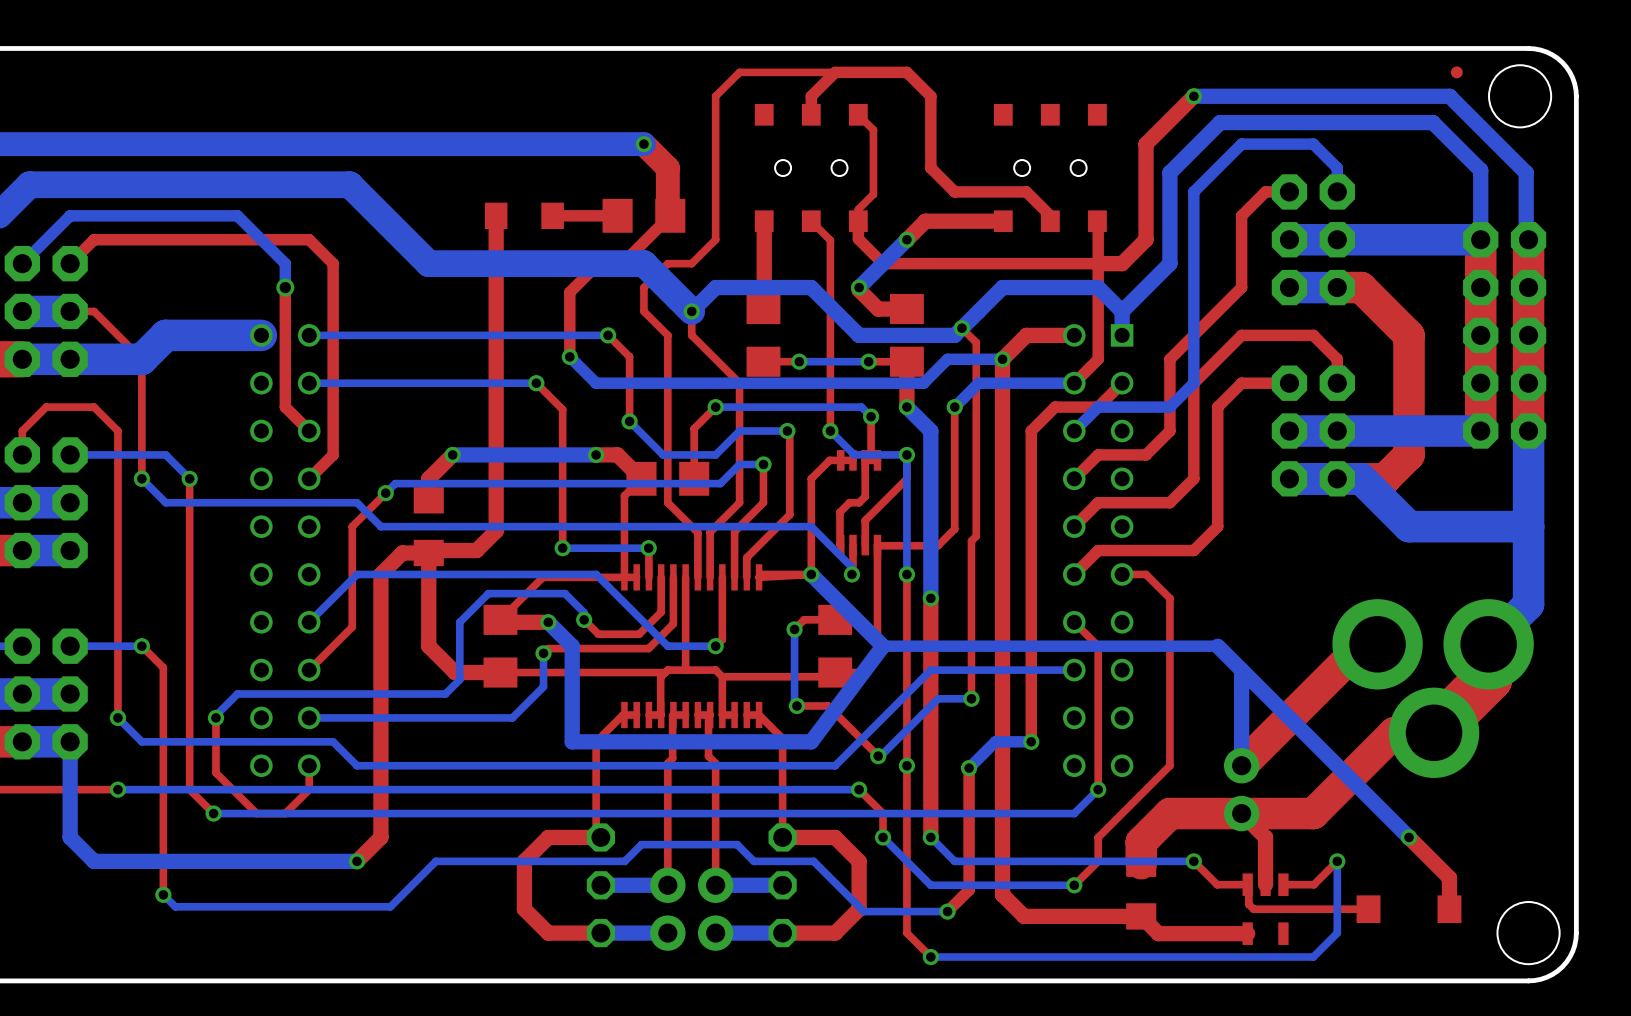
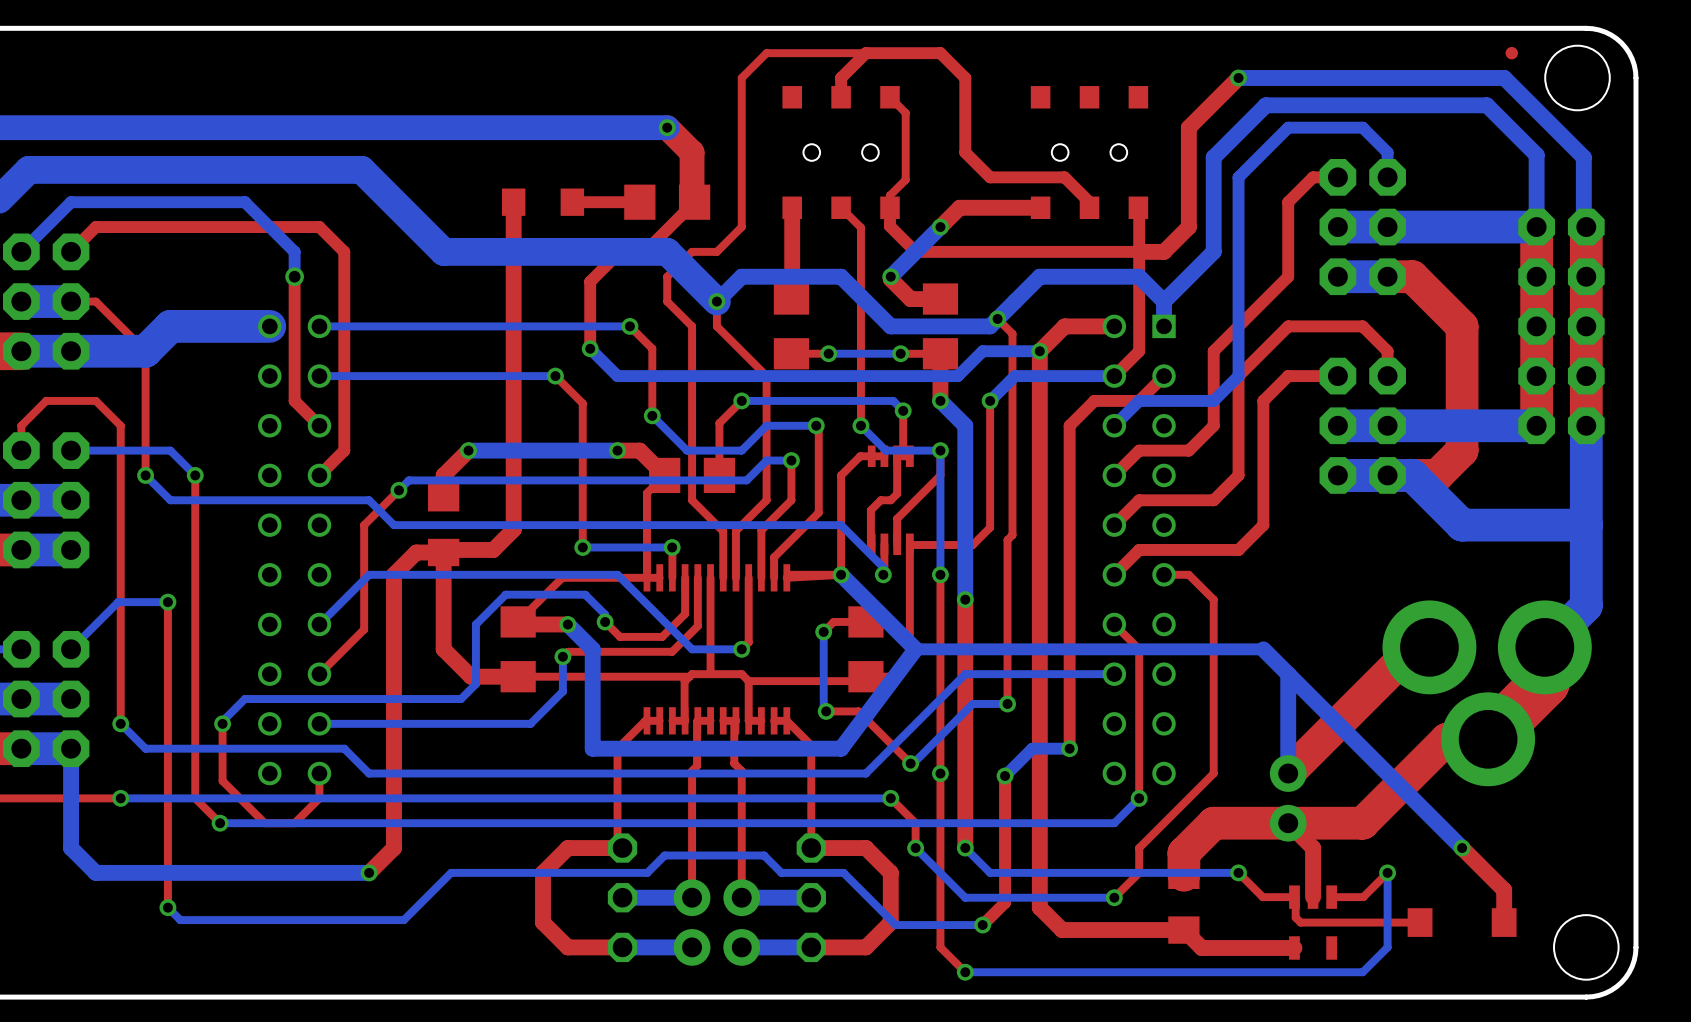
top track: (141, 646) (163, 667) -> (167, 602) (167, 671)
bottom track: (141, 646) (70, 646) -> (167, 602) (118, 602) (71, 649)
via position: (141, 646) -> (167, 602)

